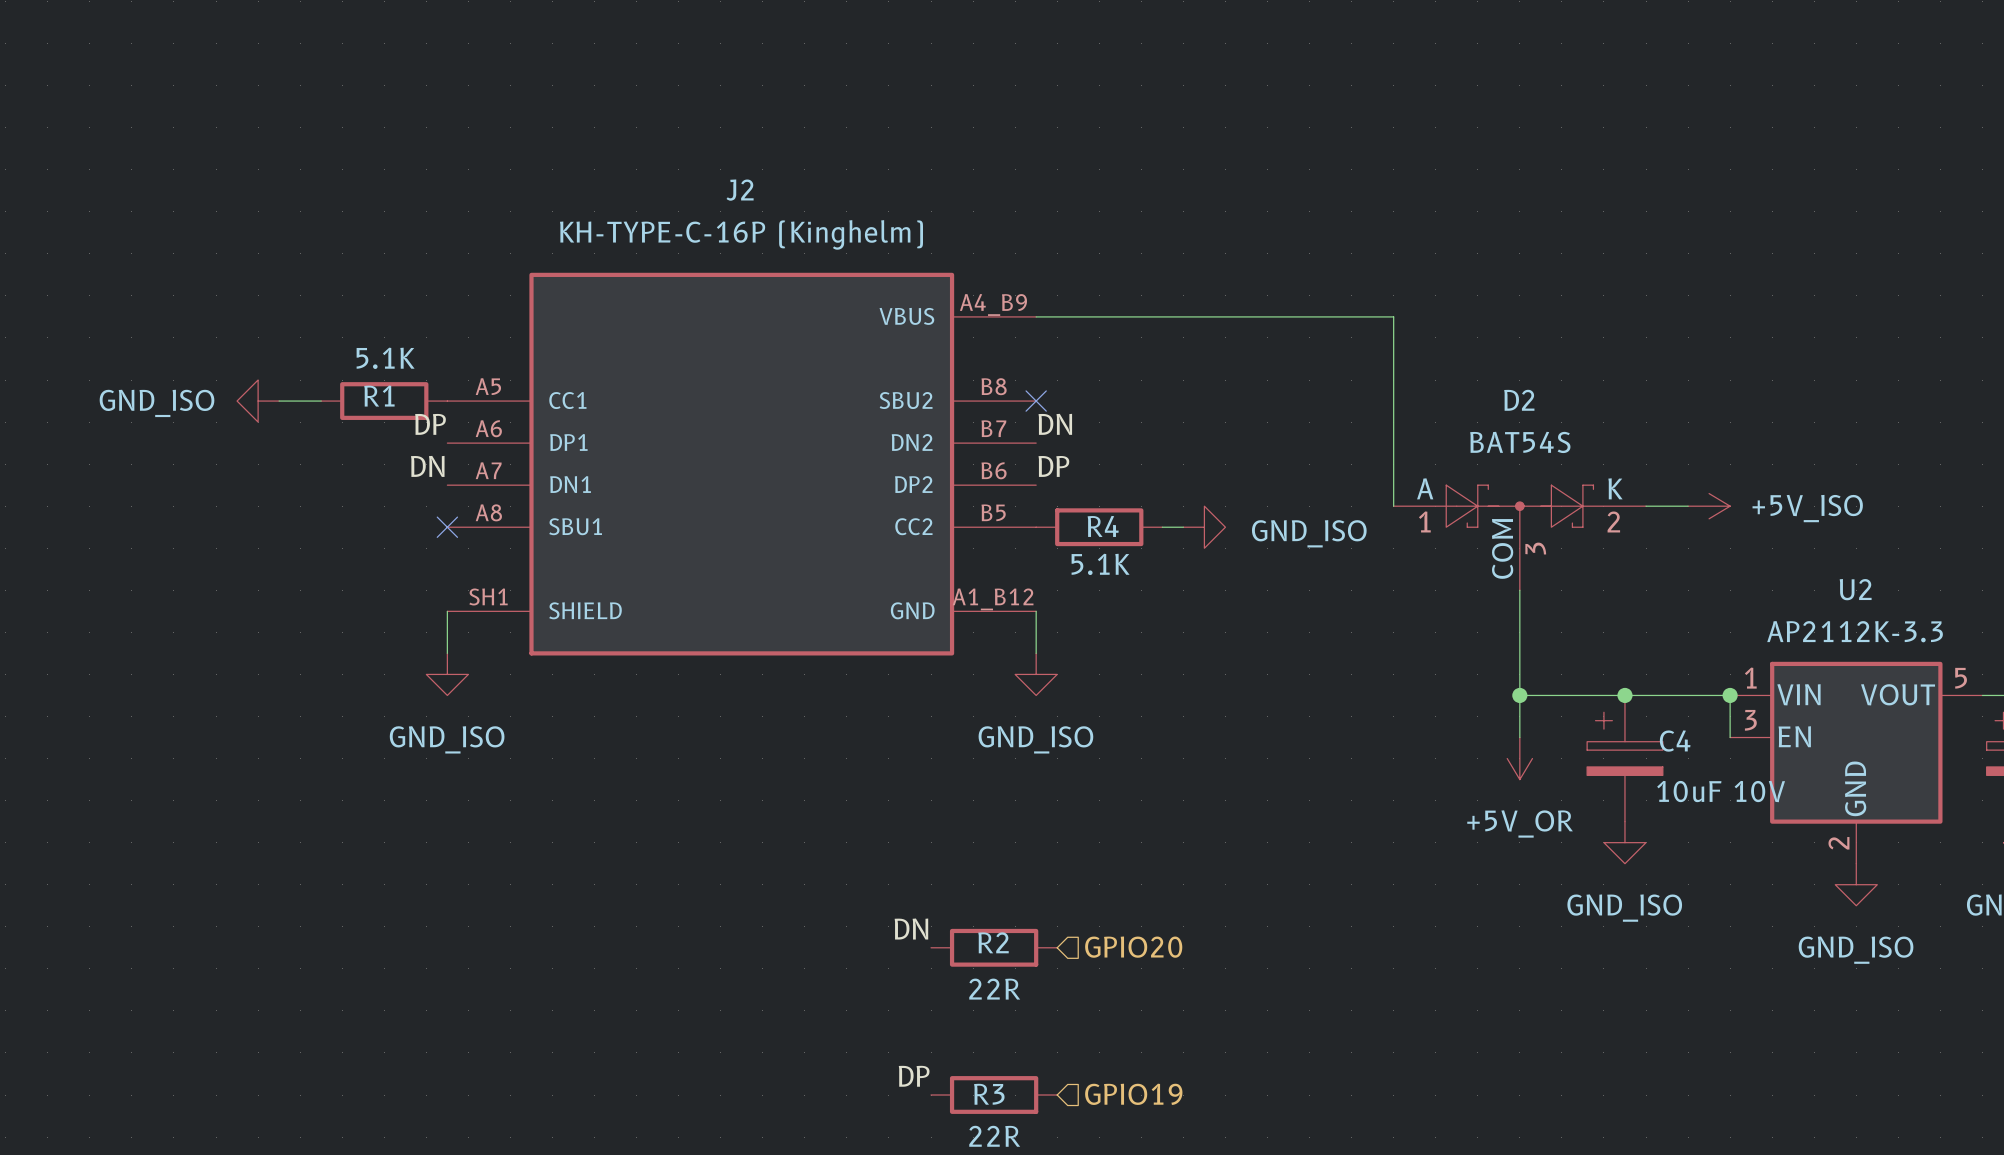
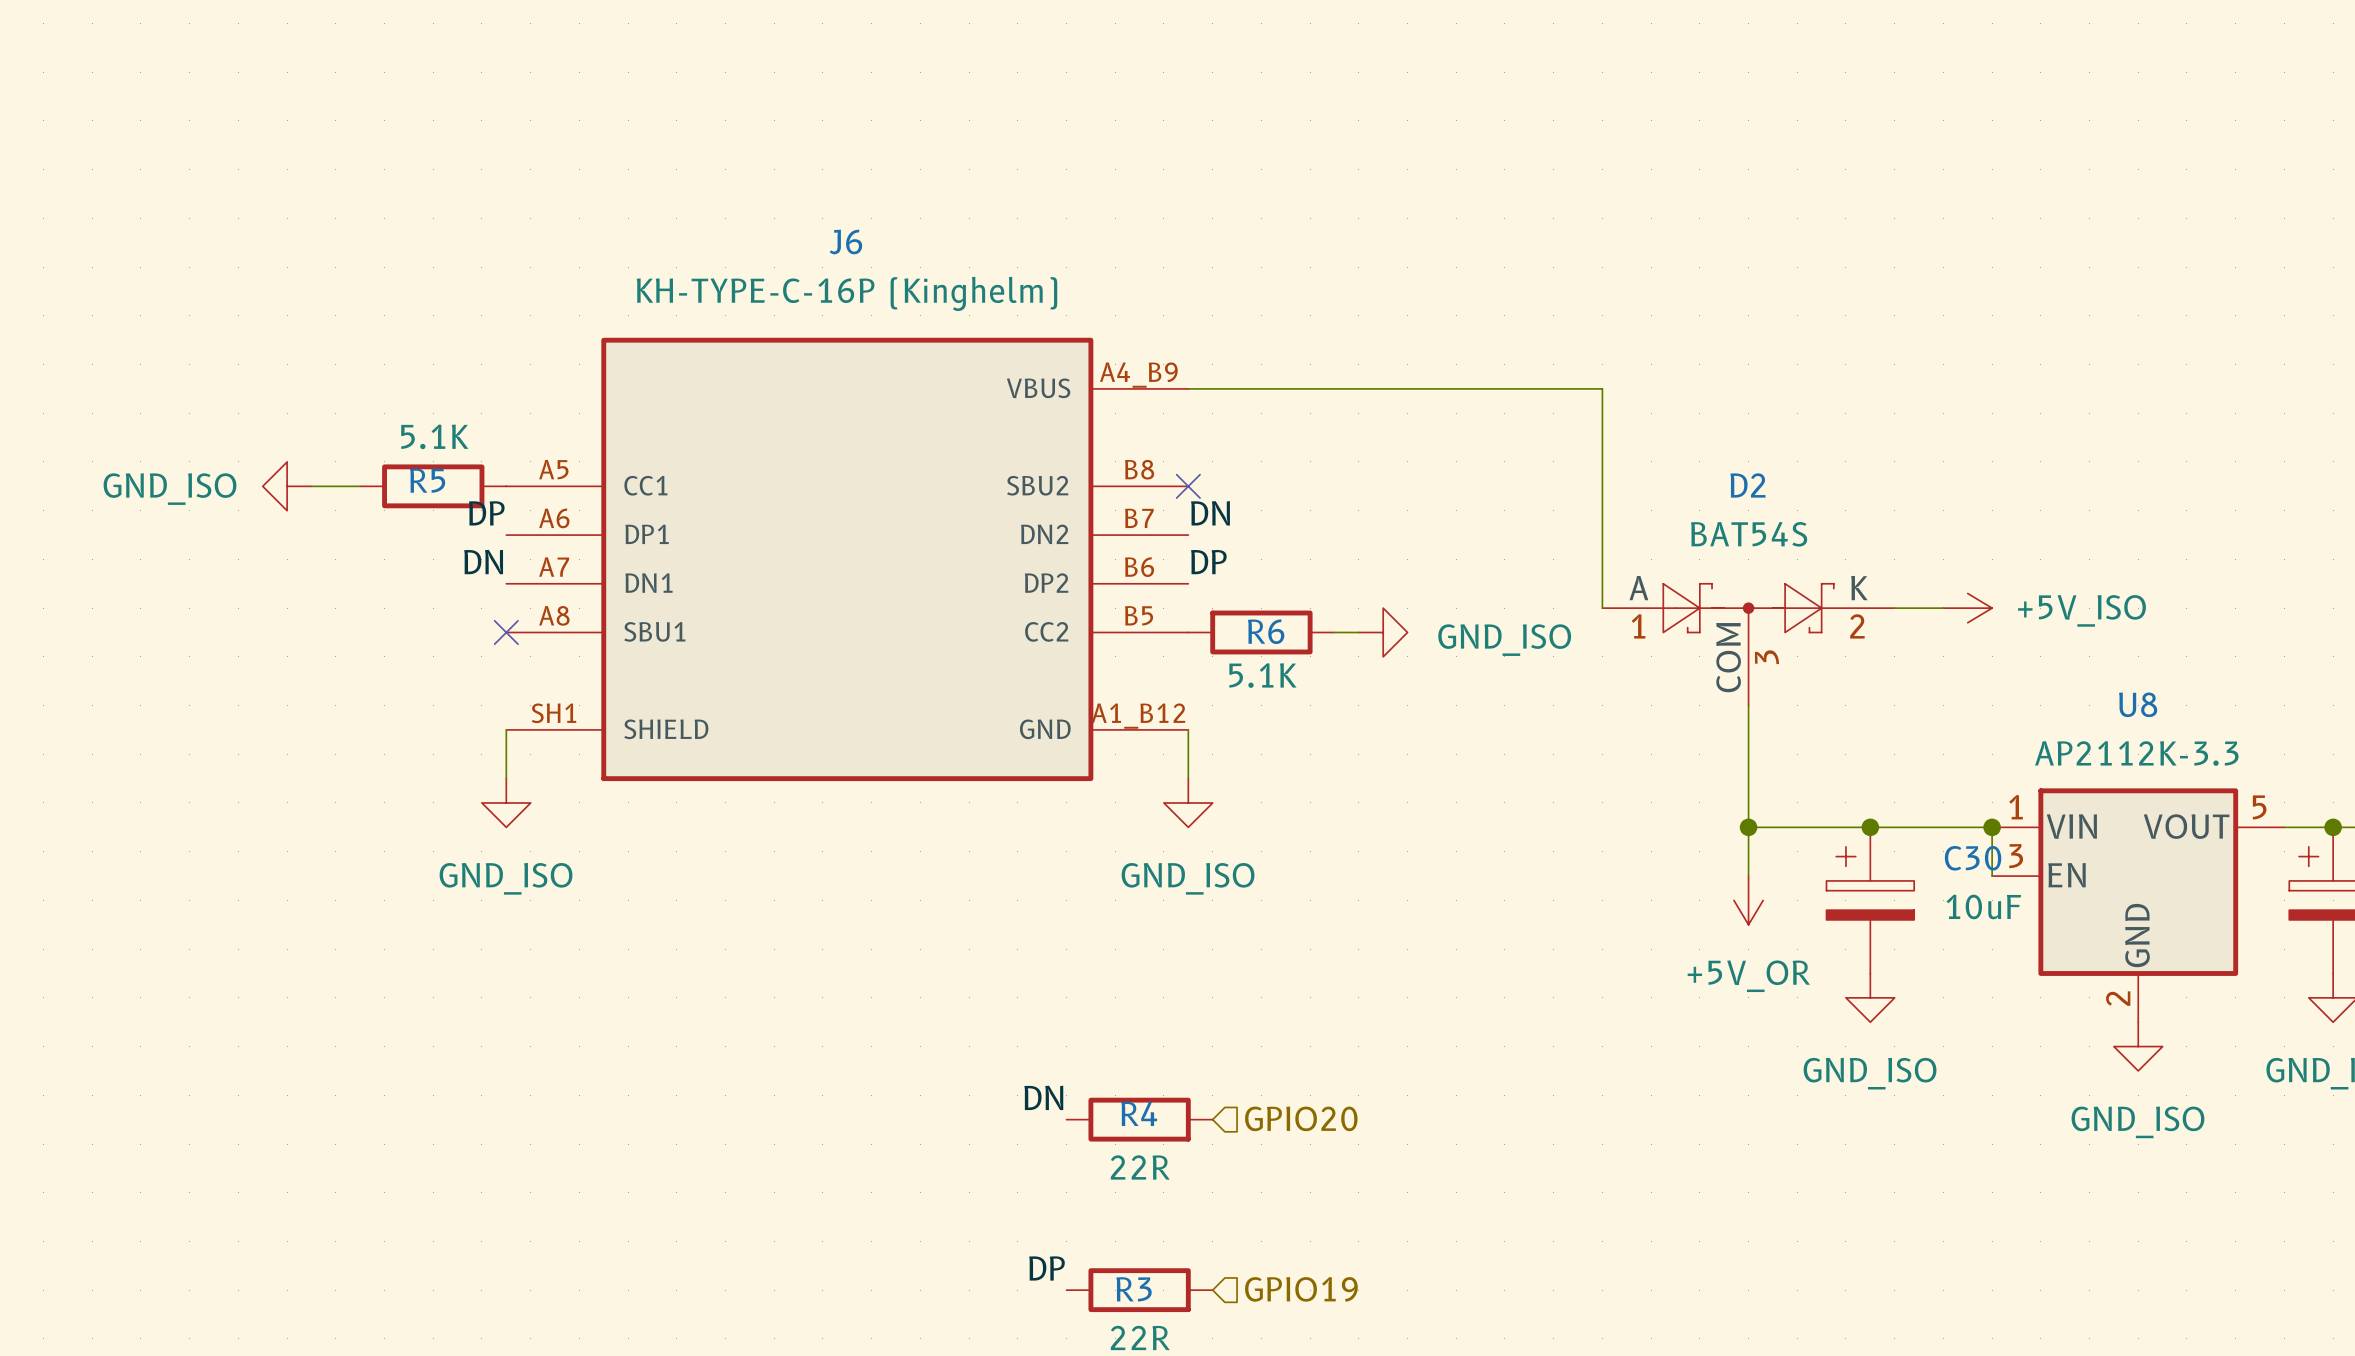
J2 name: J2 (740, 190) -> J6 (845, 242)
R1 name: R1 (379, 396) -> R5 (427, 480)
R4 name: R4 (1103, 526) -> R6 (1266, 631)
U2 name: U2 (1855, 589) -> U8 (2138, 704)
C4 name: C4 (1675, 741) -> C30 (1973, 858)
C4 value: 10uF 10V (1721, 791) -> 10uF (1983, 906)
R2 name: R2 (993, 942) -> R4 (1139, 1113)

